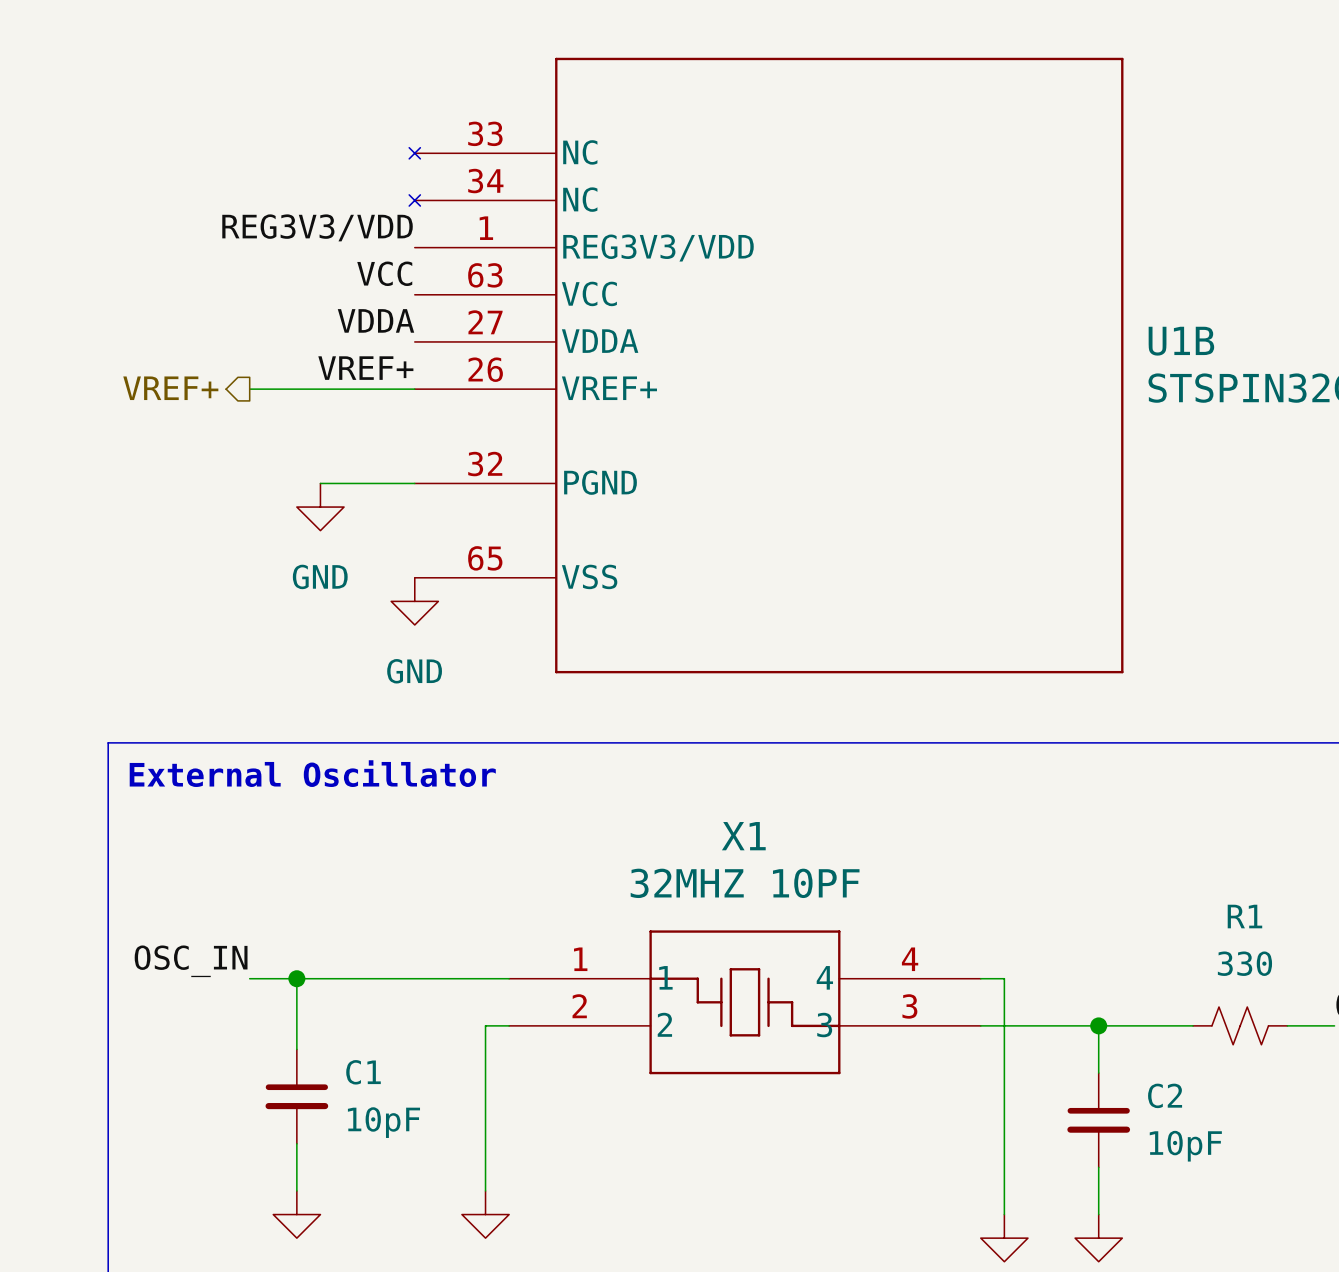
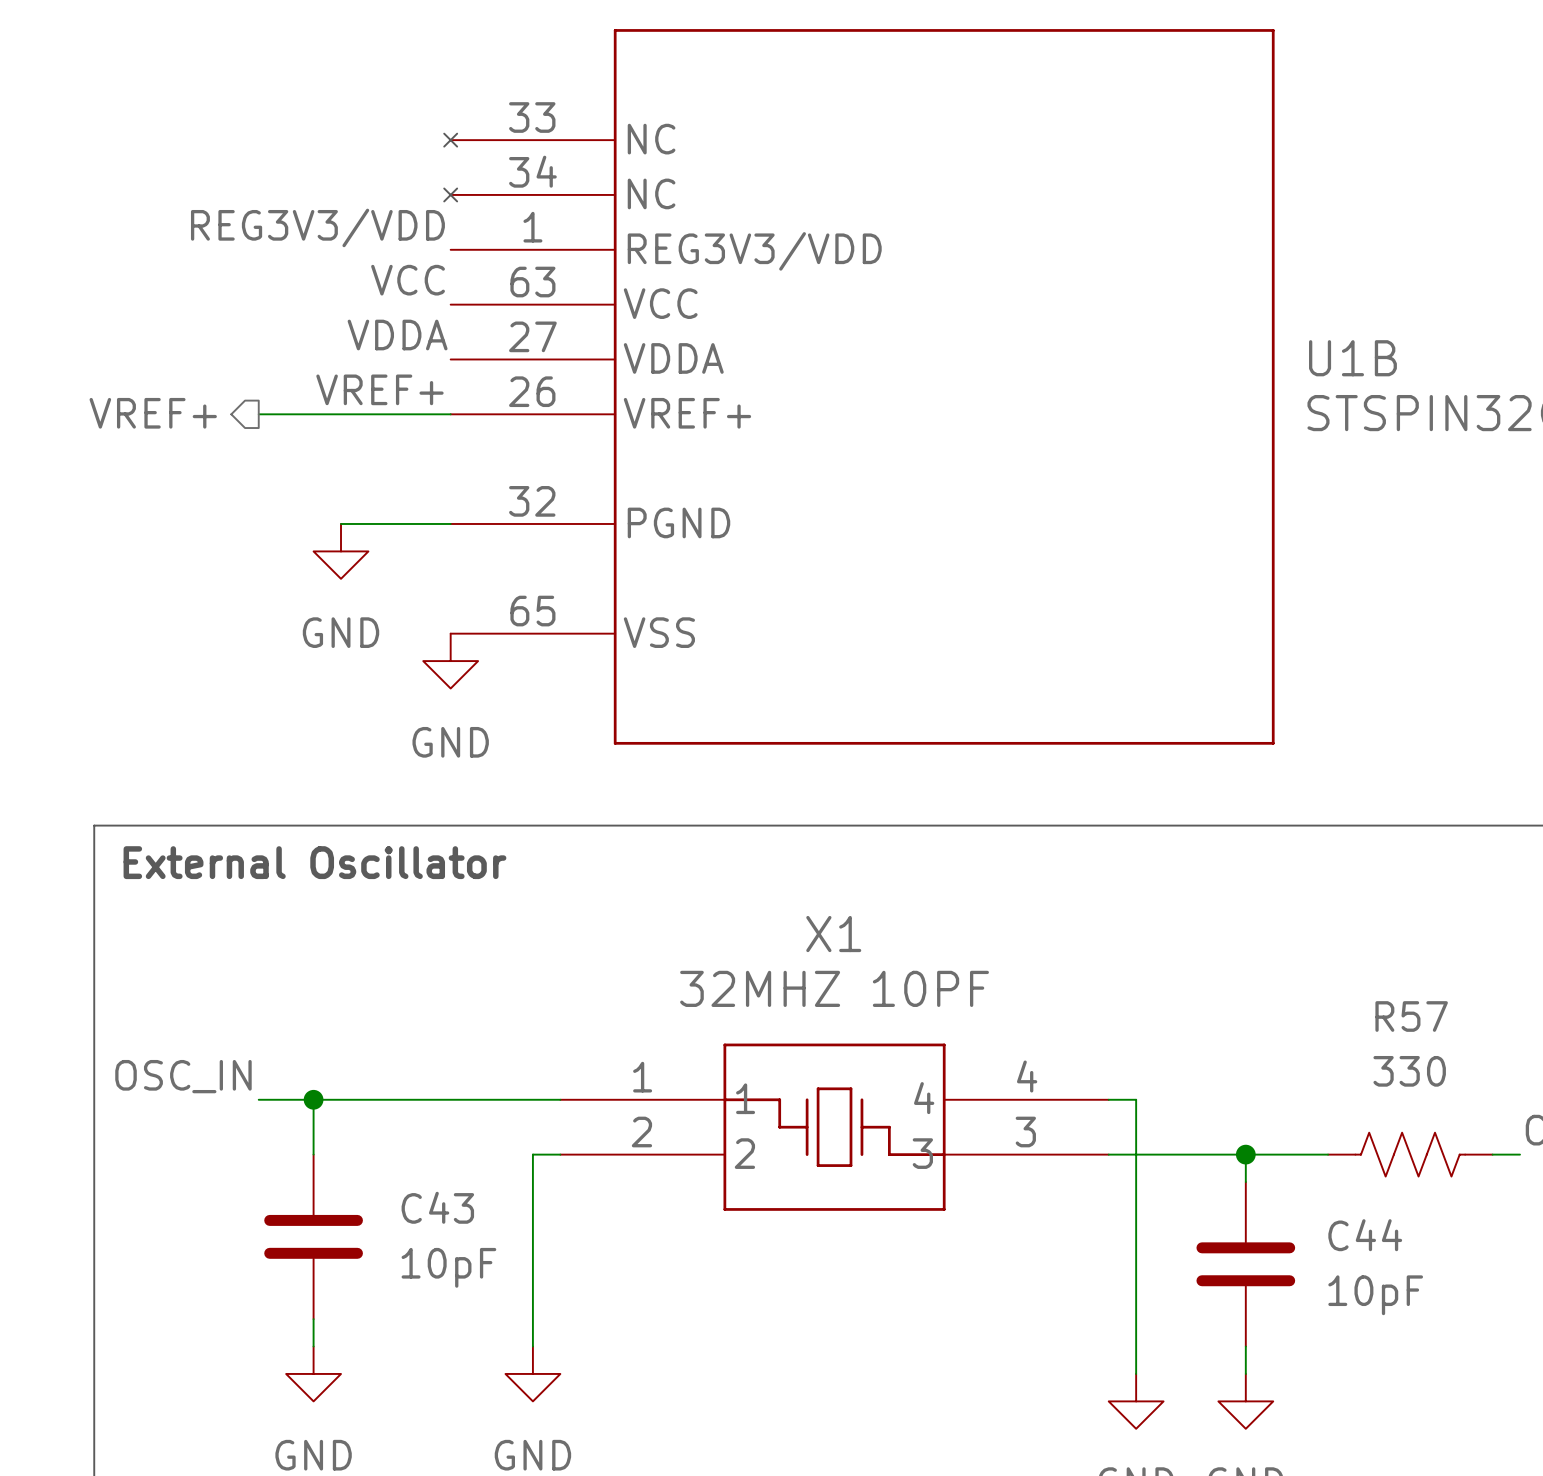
R1: 330 (1240, 1025) -> none
R57: none -> 330 (1410, 1154)
C1: 10pF (296, 1096) -> none
C43: none -> 10pF (313, 1236)
C2: 10pF (1098, 1120) -> none
C44: none -> 10pF (1245, 1264)

